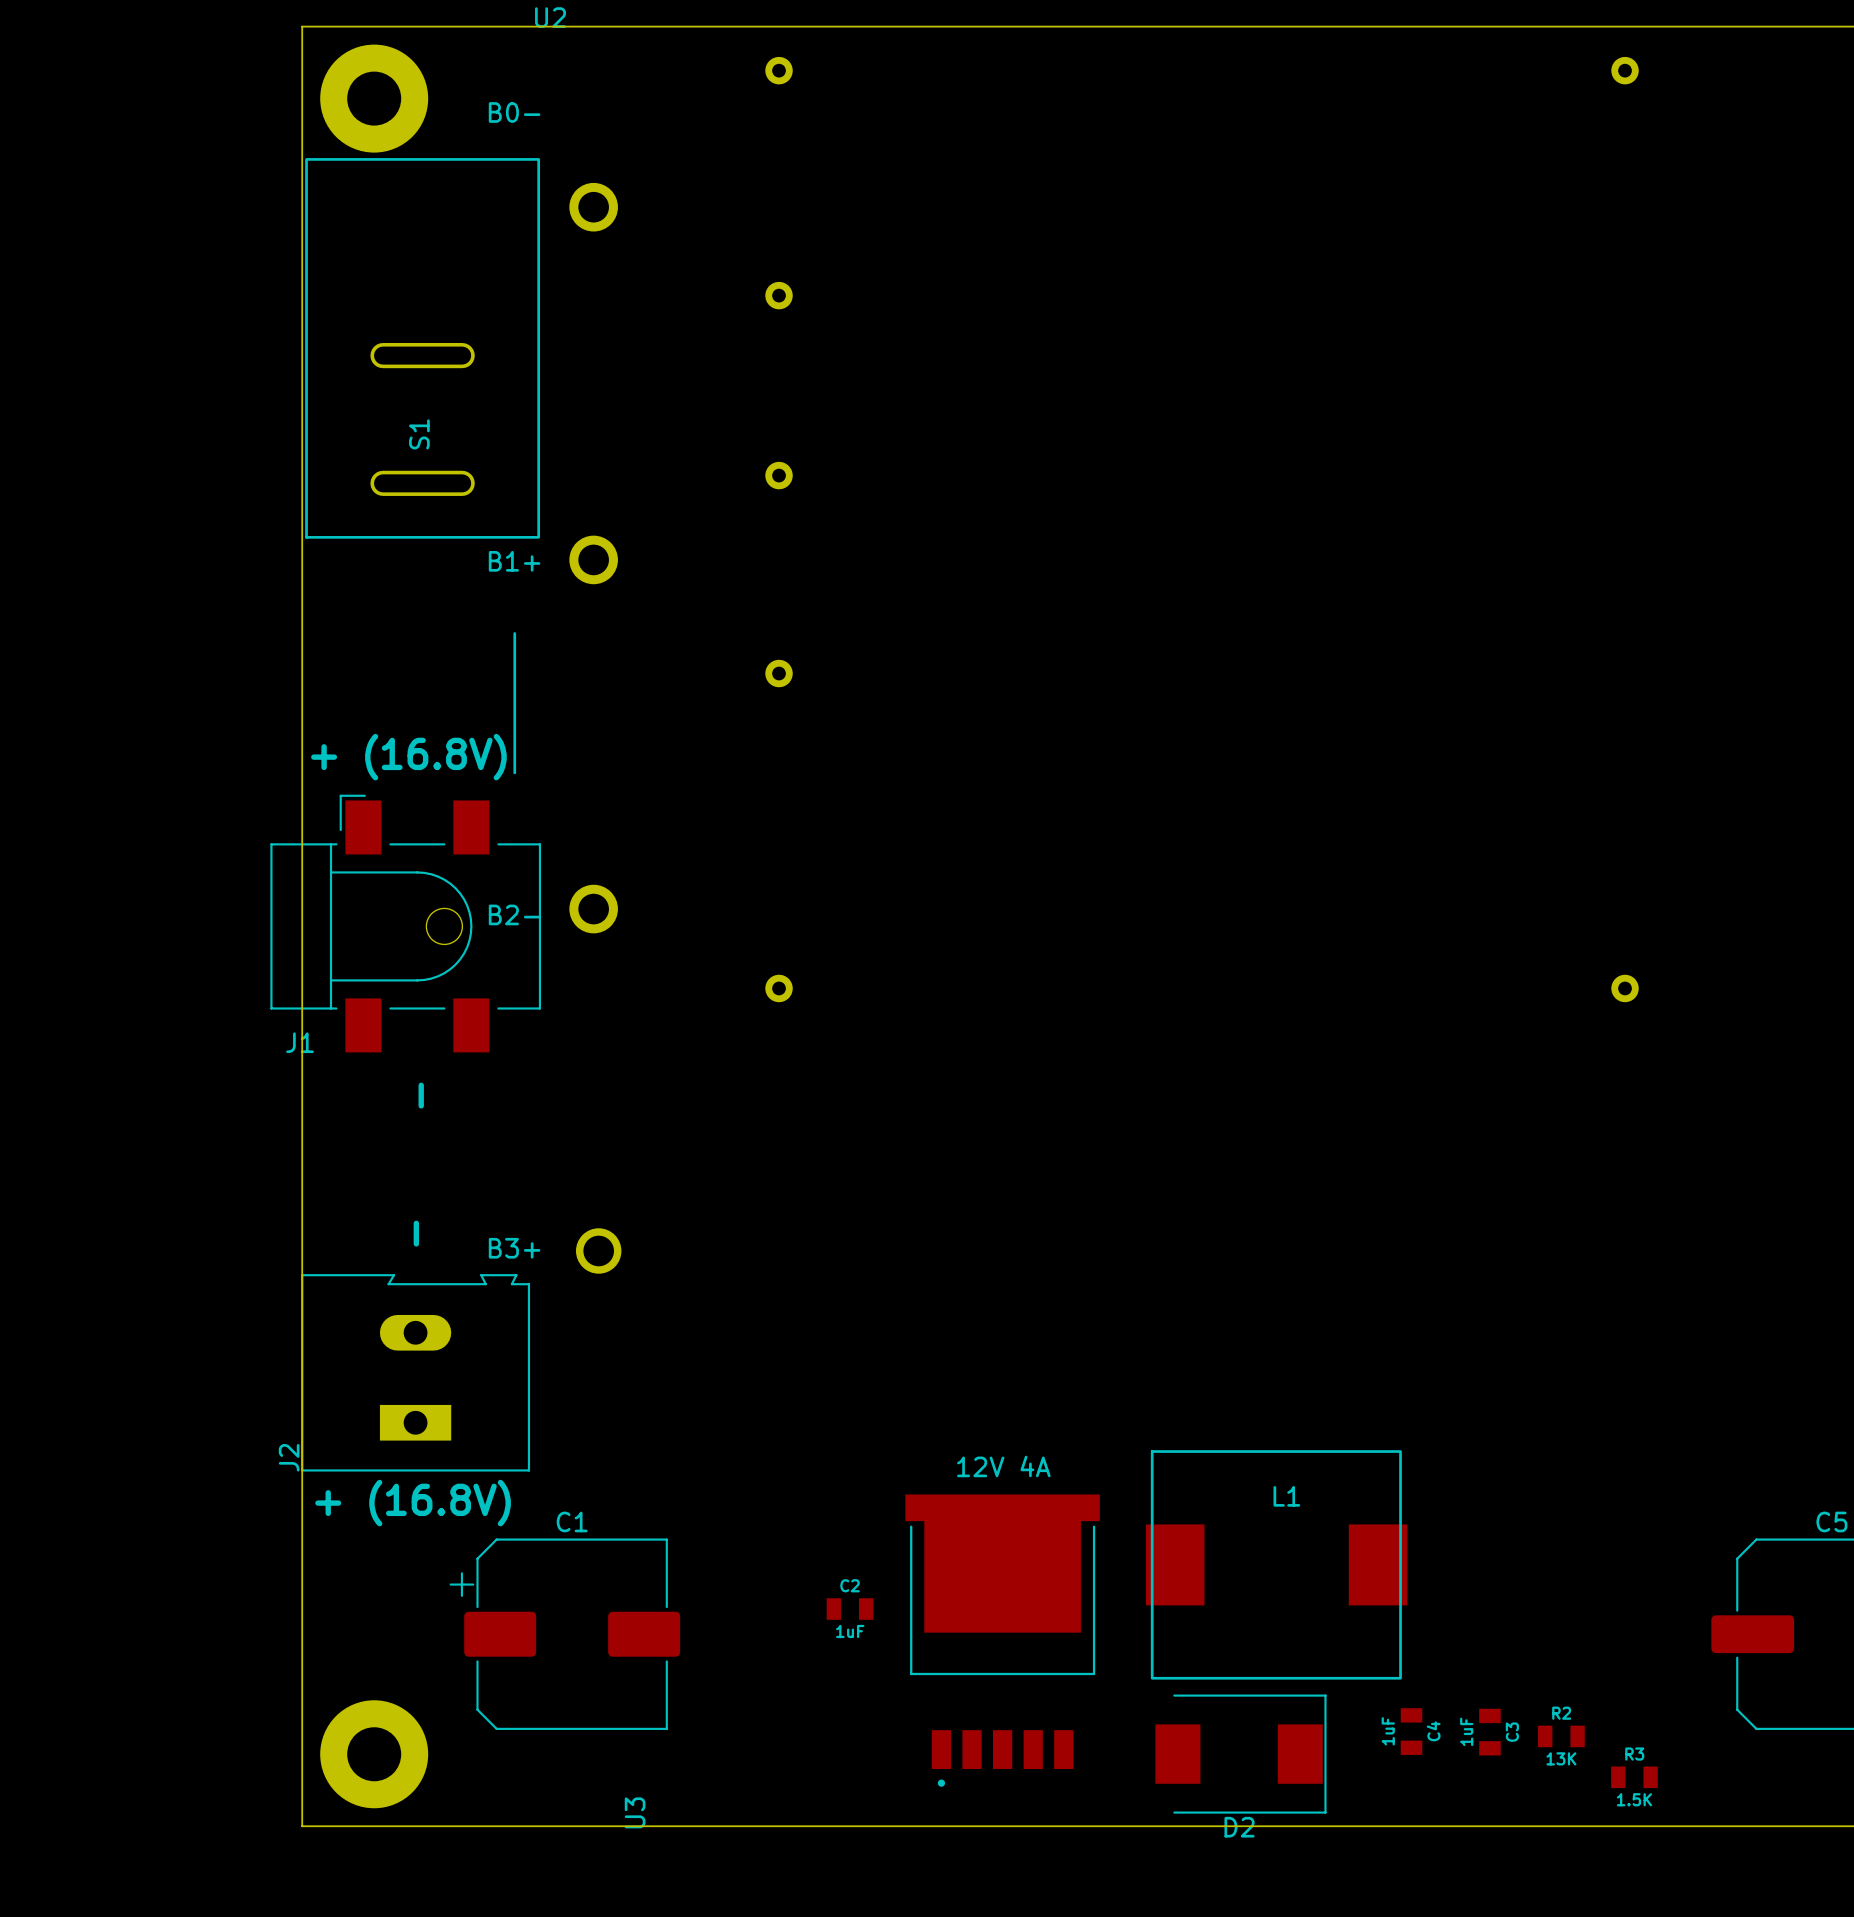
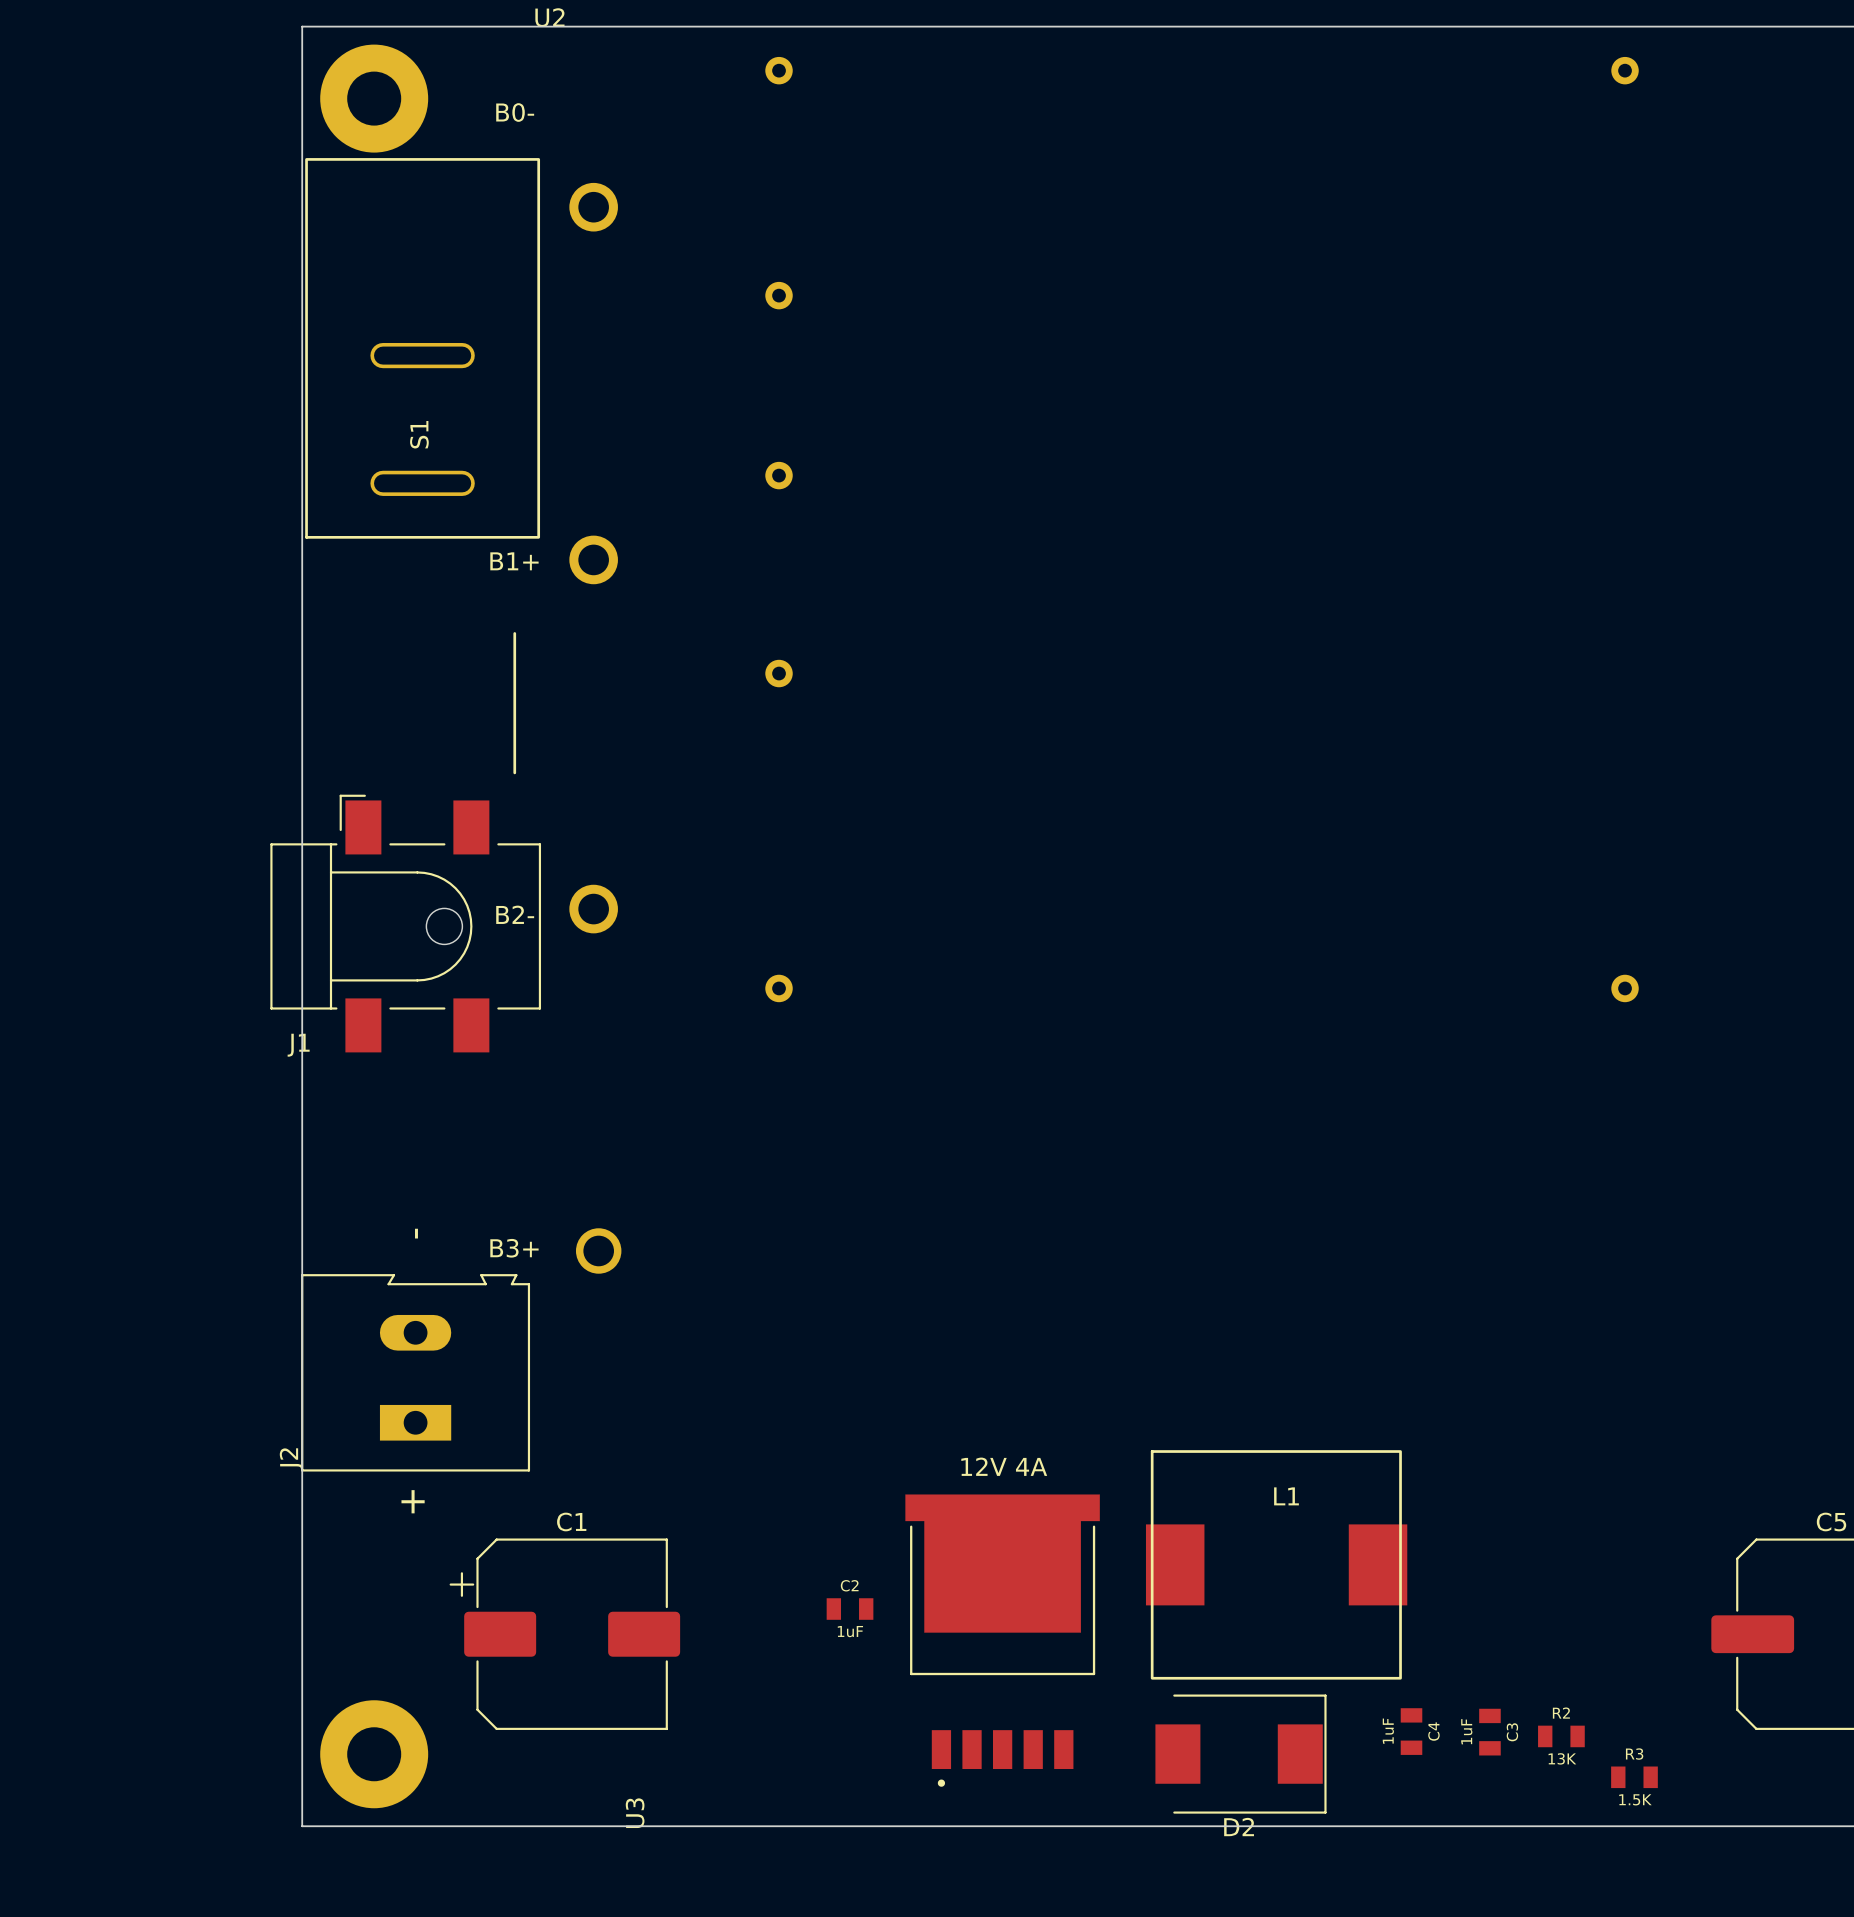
text: + (16.8V) (408, 757) -> none
text: - (421, 1095) -> none
text: + (16.8V) (413, 1503) -> + (413, 1501)

